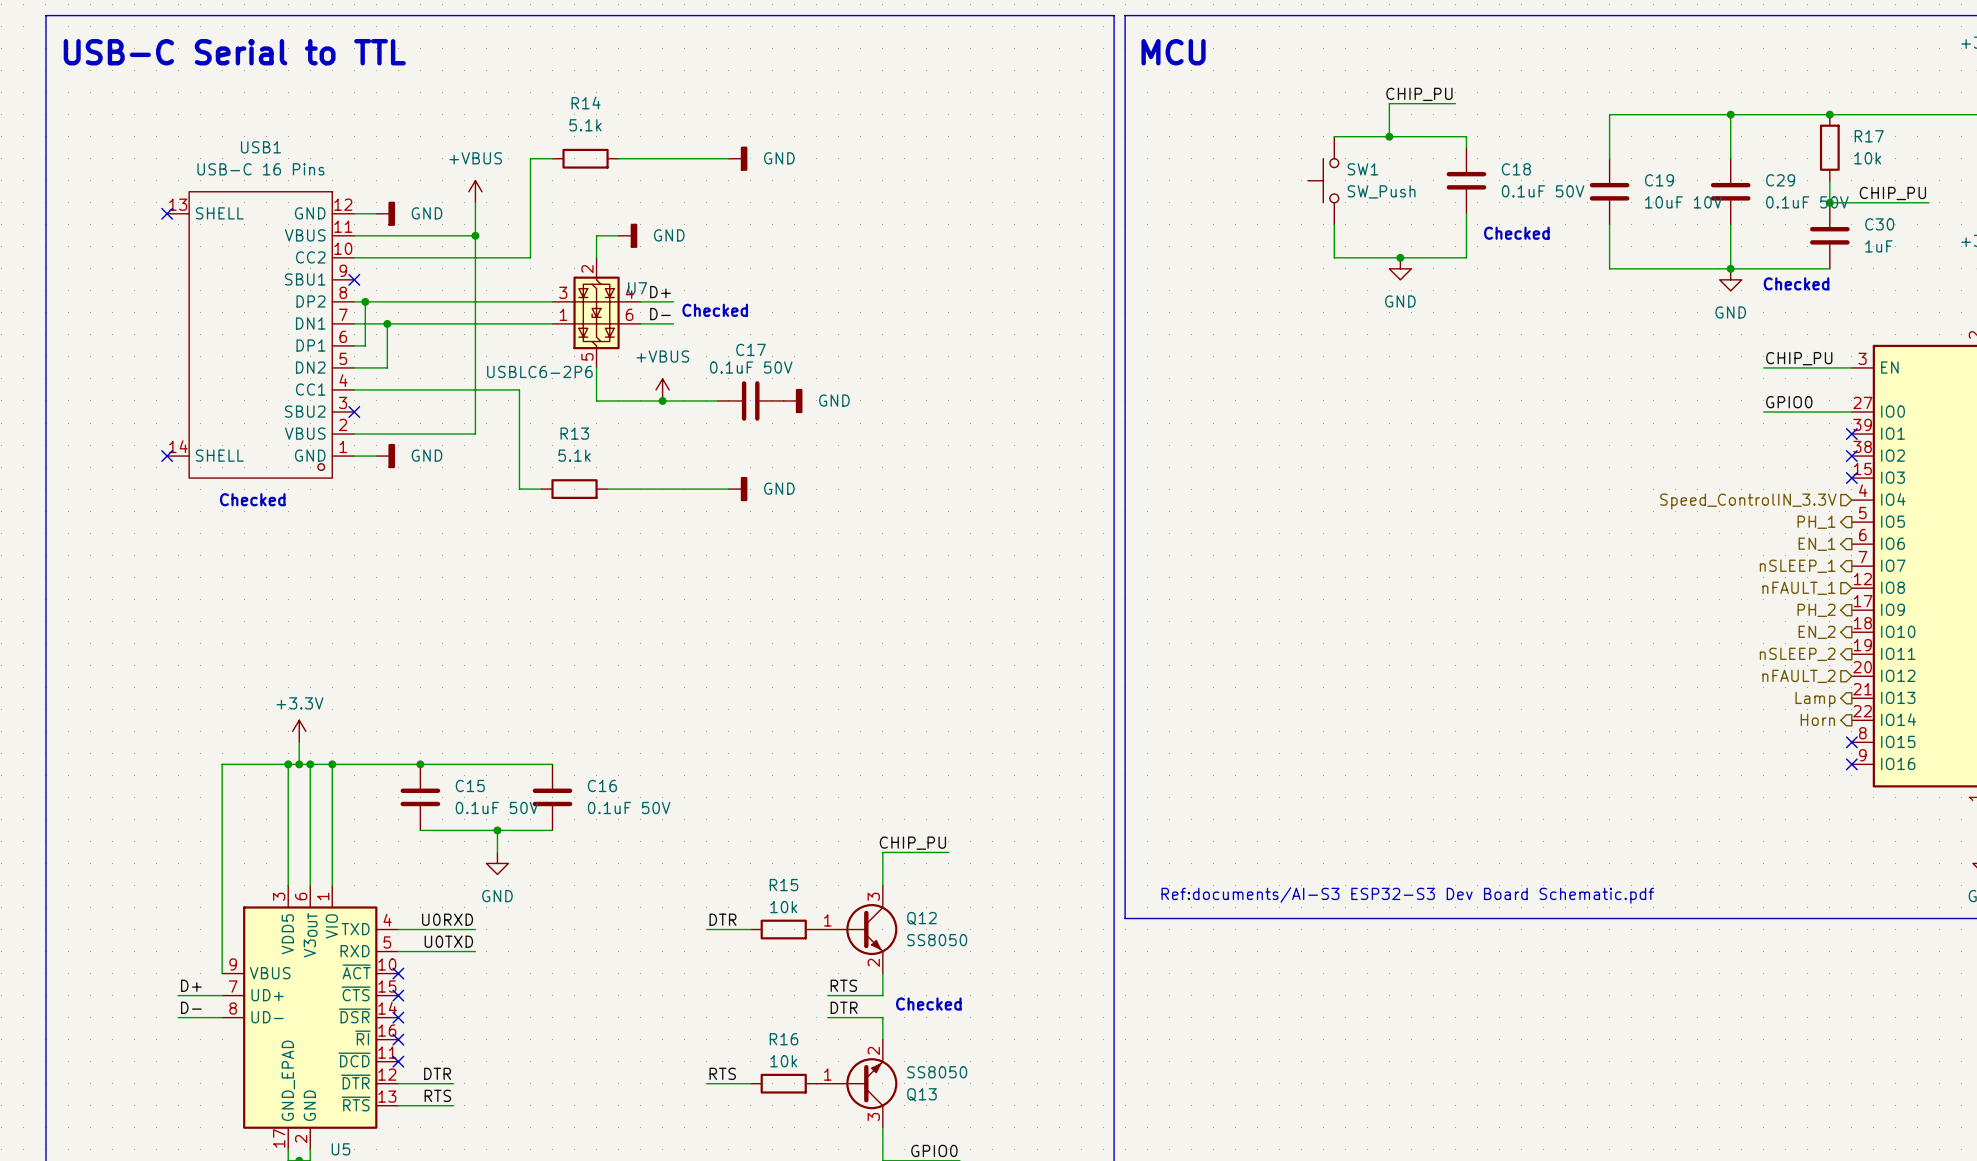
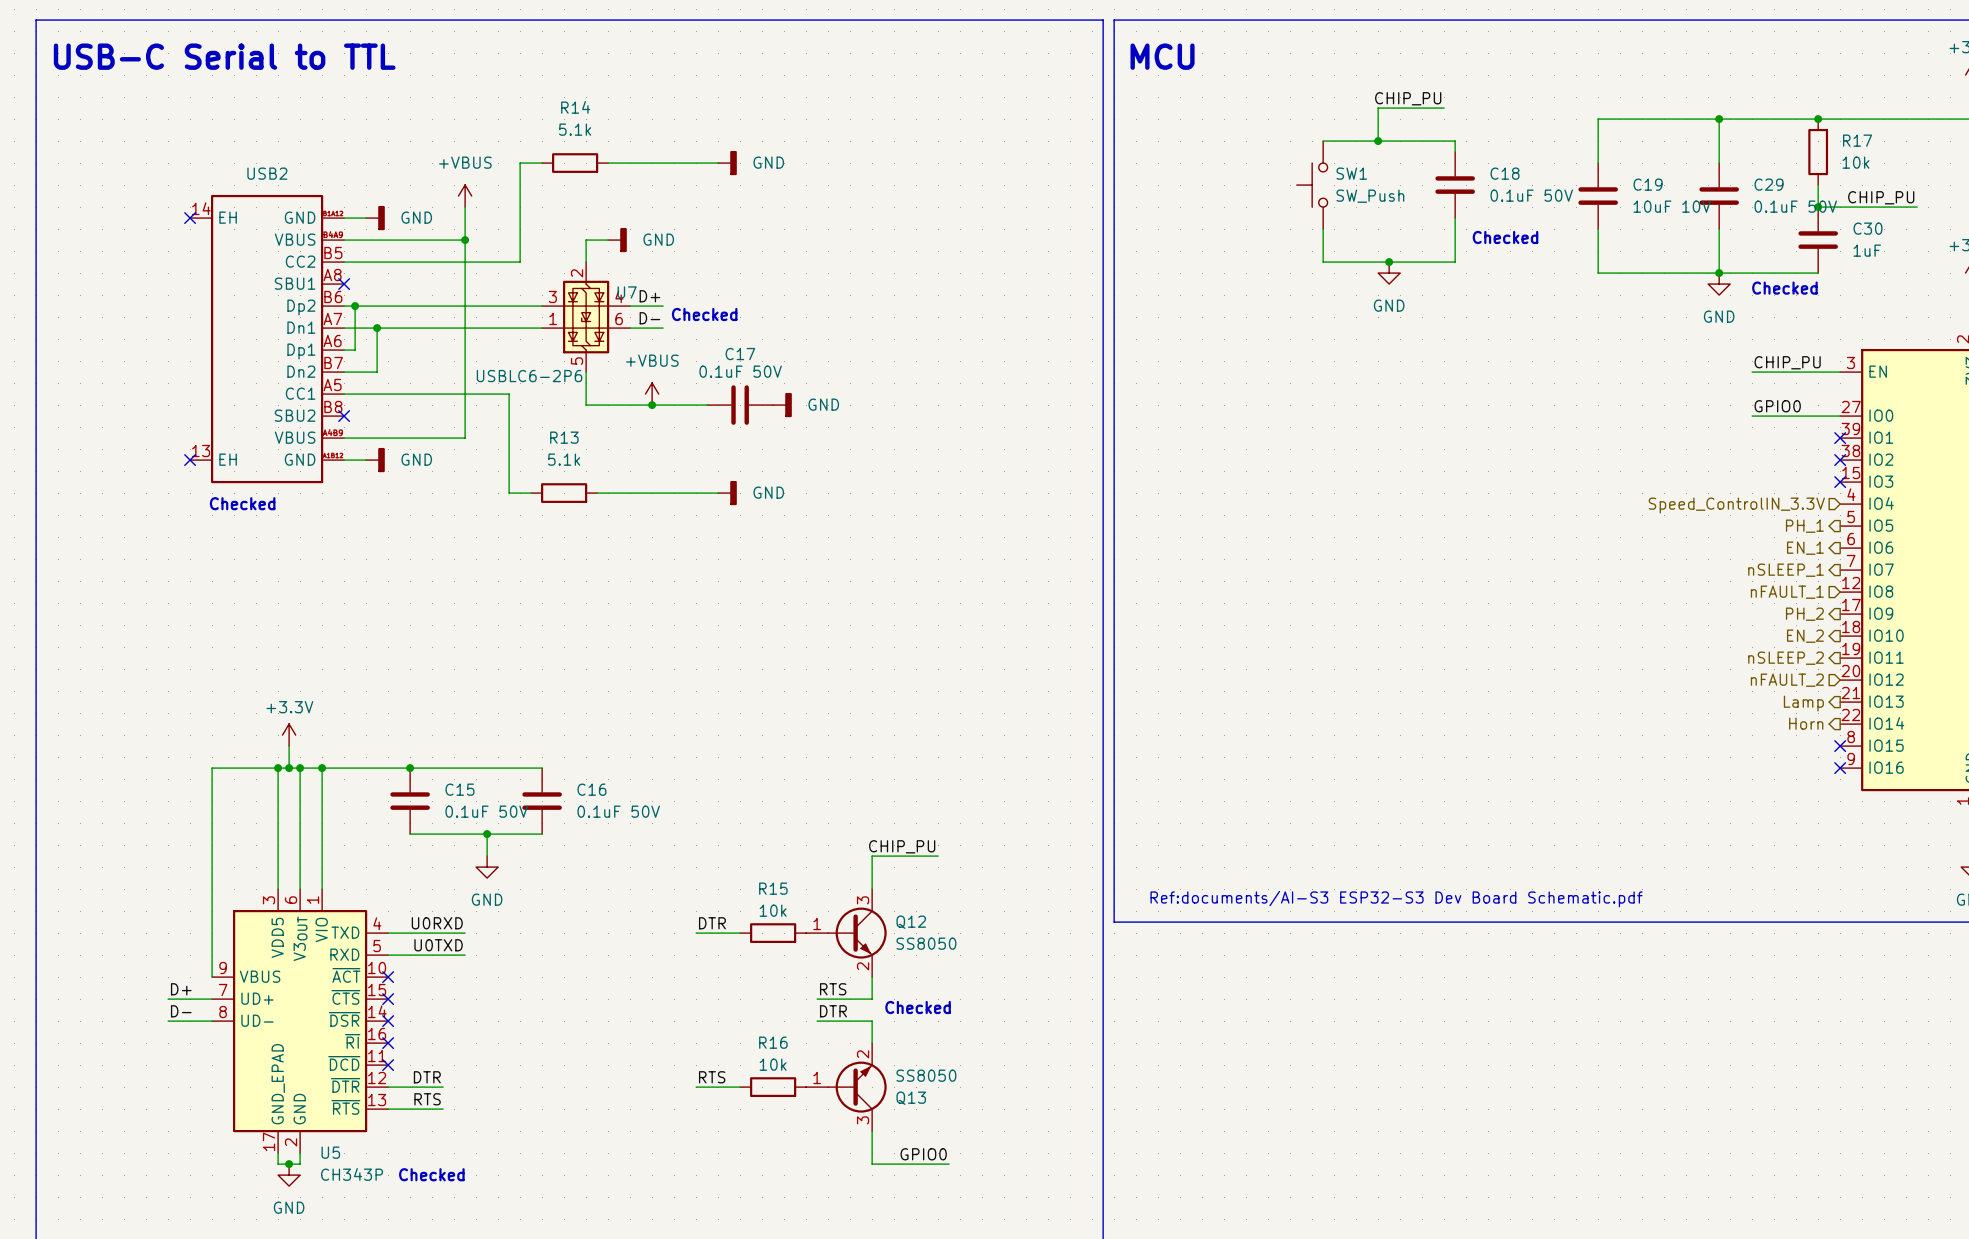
no-connect mark position: (167, 213) -> (190, 218)
USB1: USB-C 16 Pins (260, 334) -> none
USB2: none -> (267, 339)
no-connect mark position: (167, 456) -> (190, 460)

